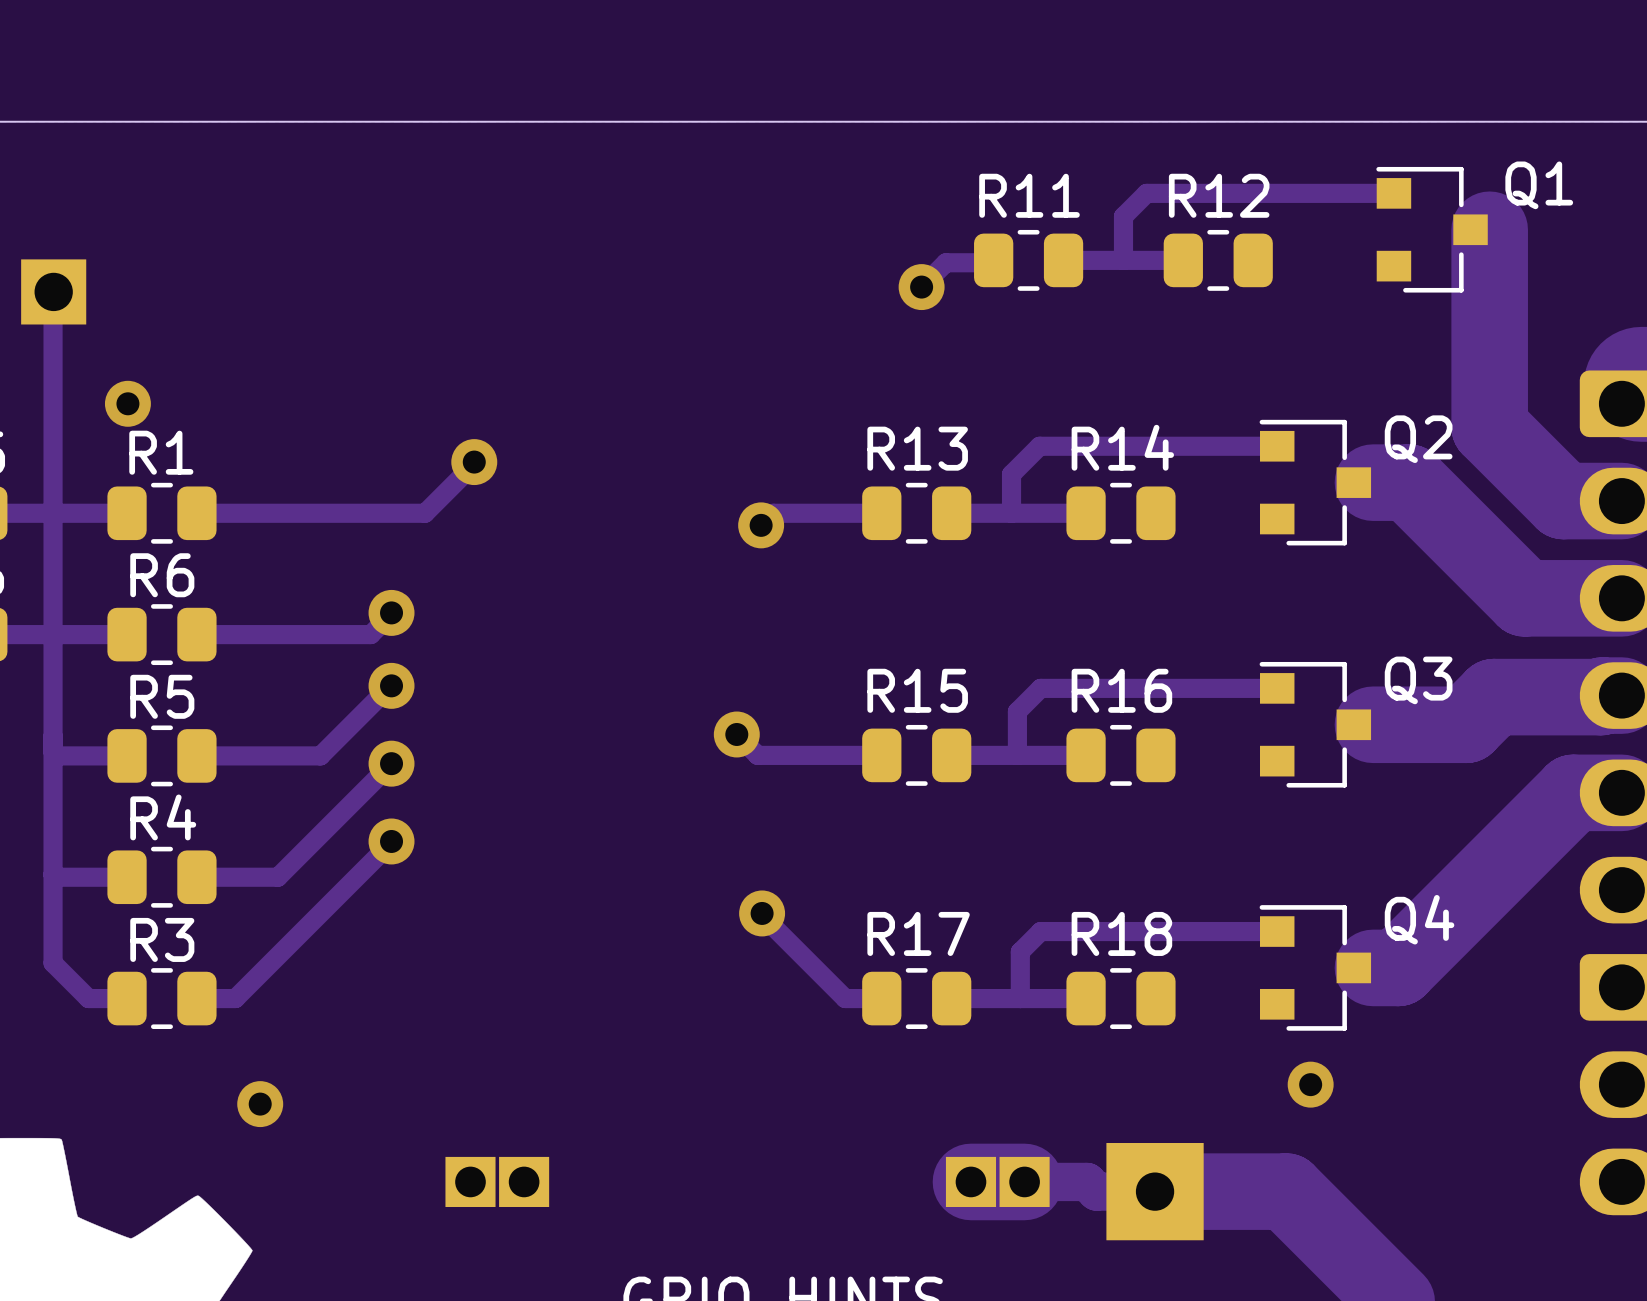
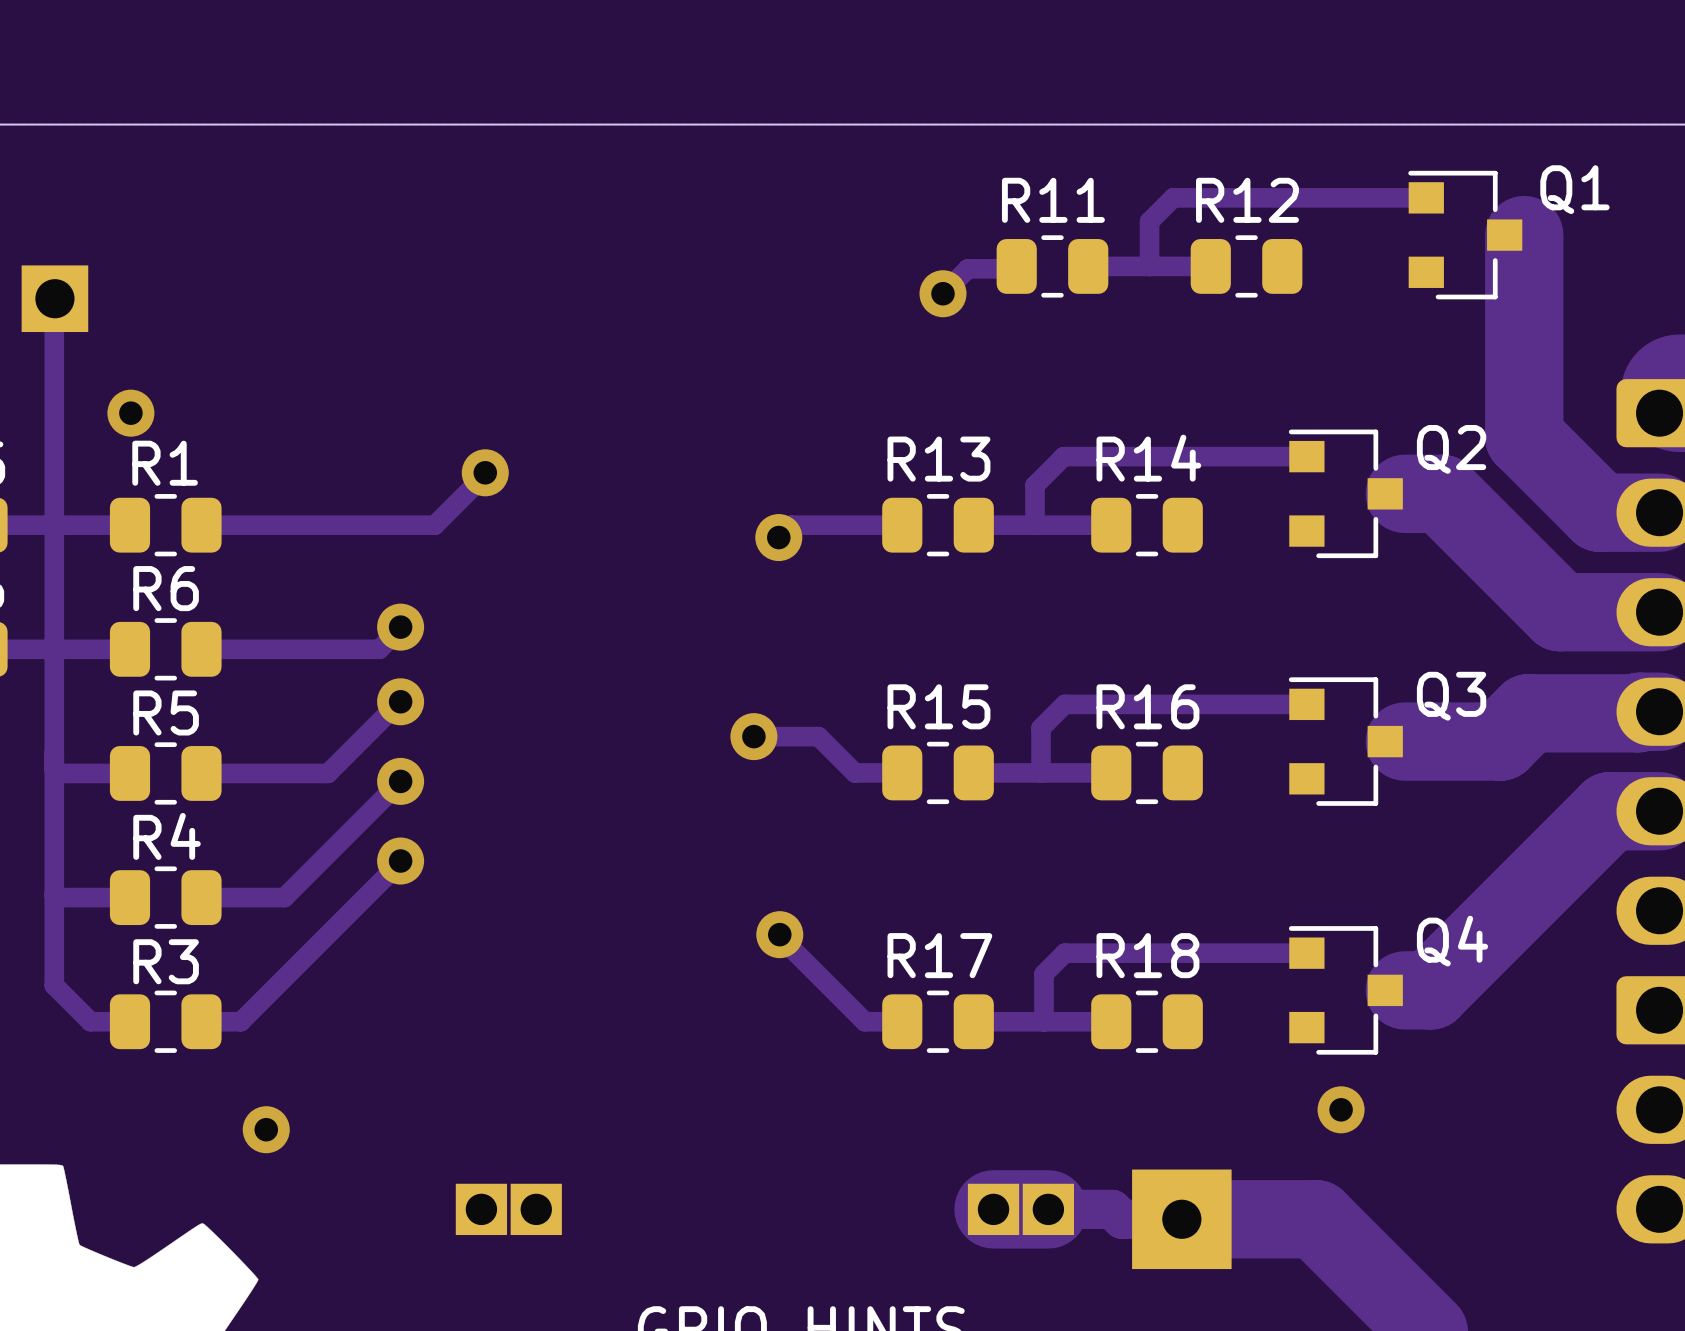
track: (736, 734) (757, 755) (835, 755) -> (753, 736) (818, 736) (854, 772)
via position: (736, 734) -> (753, 736)

